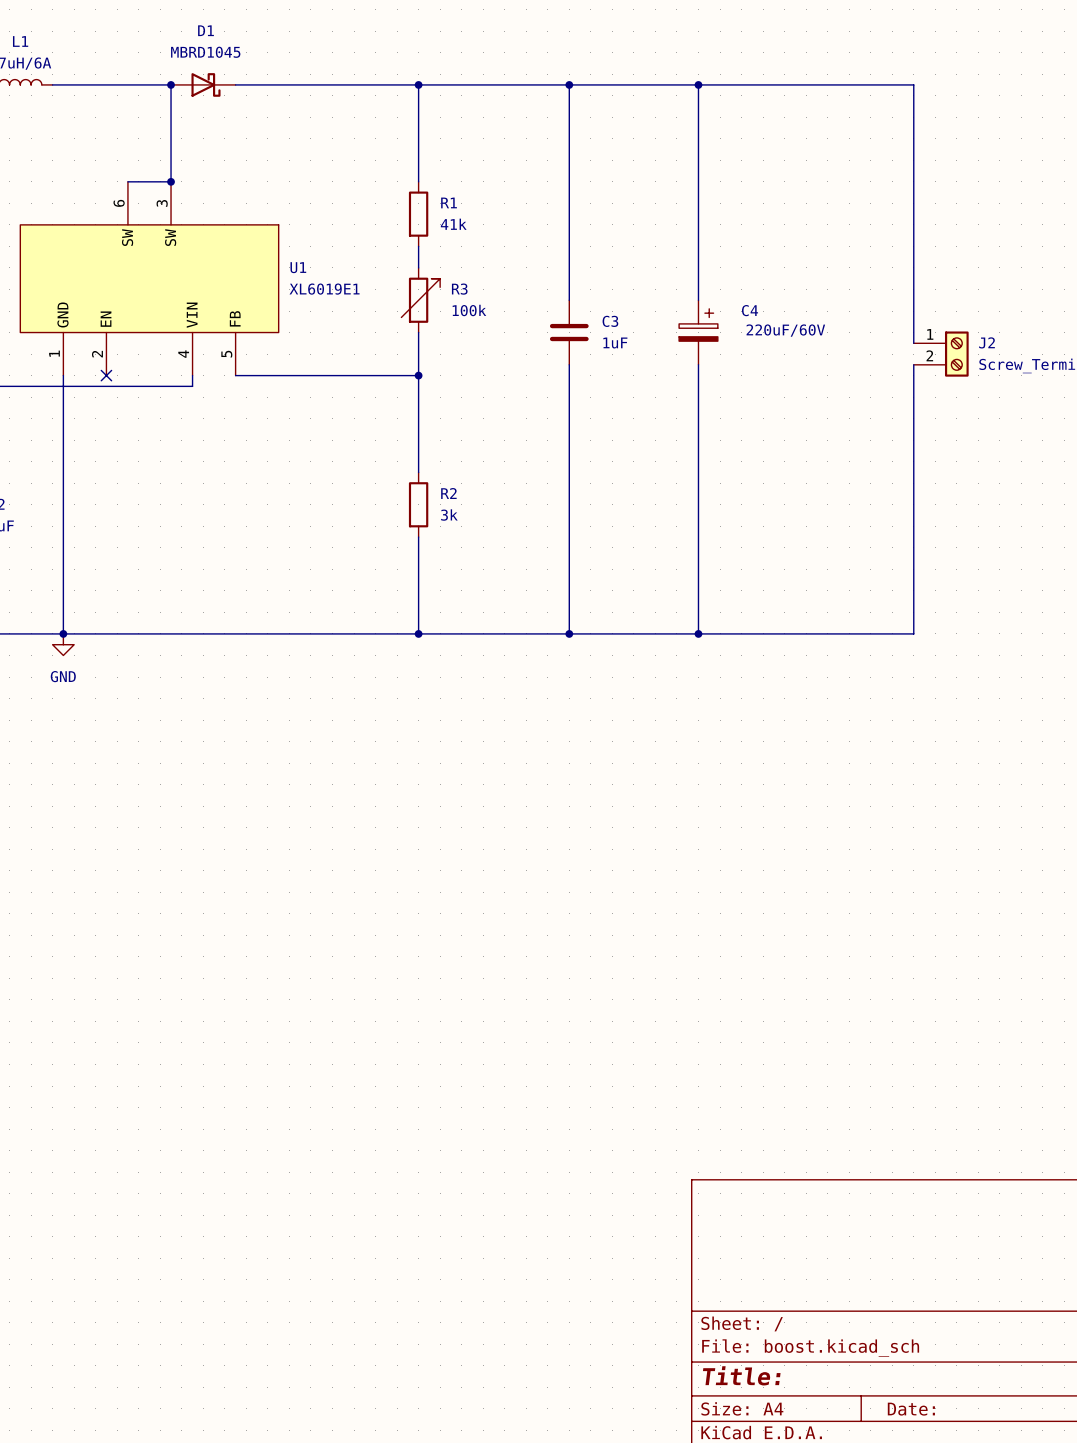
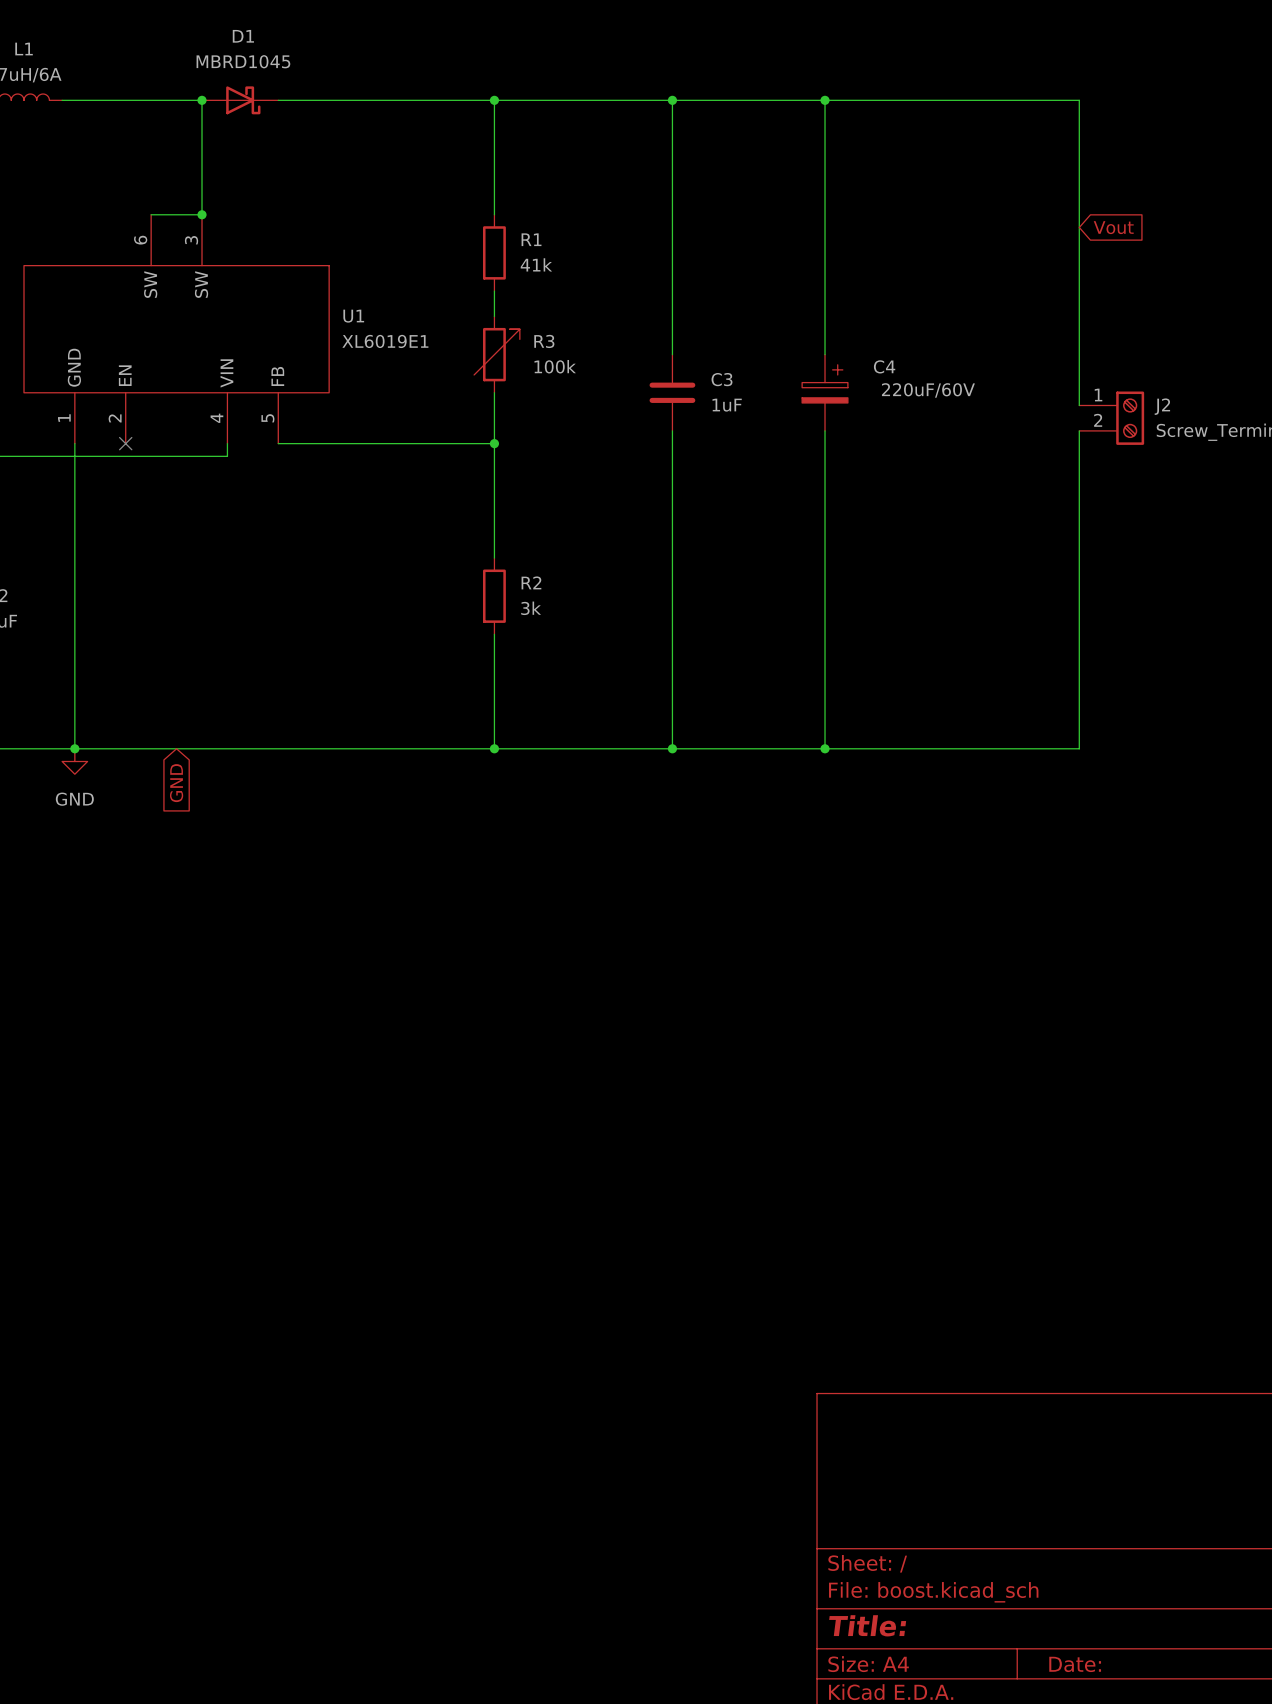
global label: none -> Vout (1113, 227)
global label: none -> GND (176, 783)

